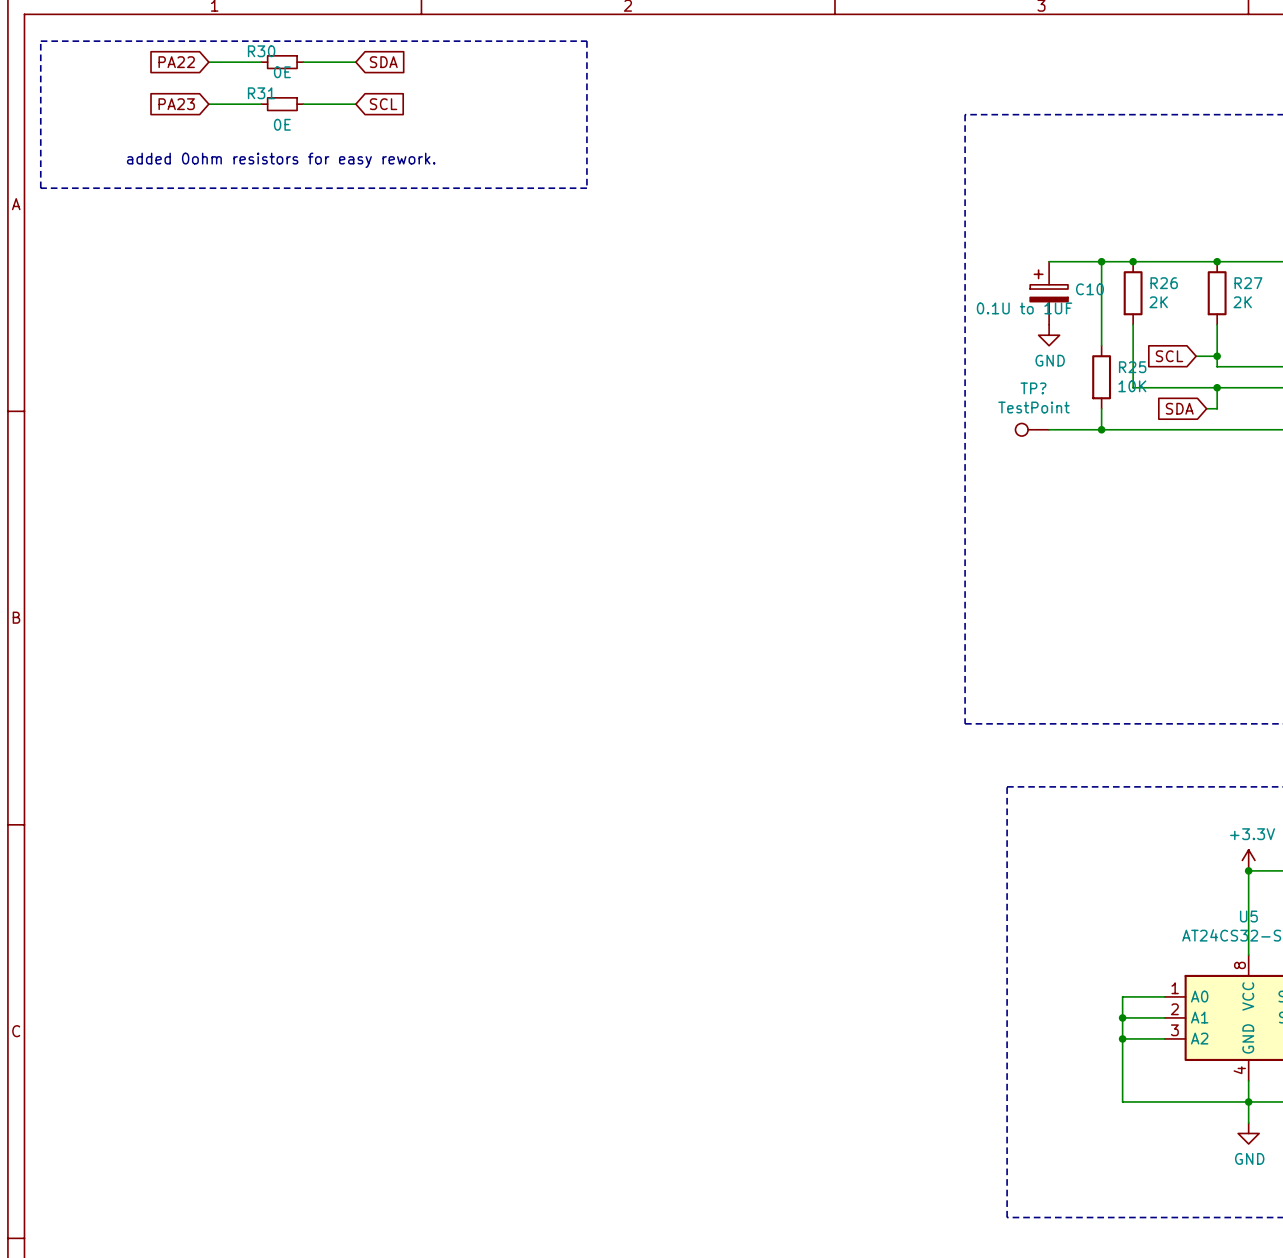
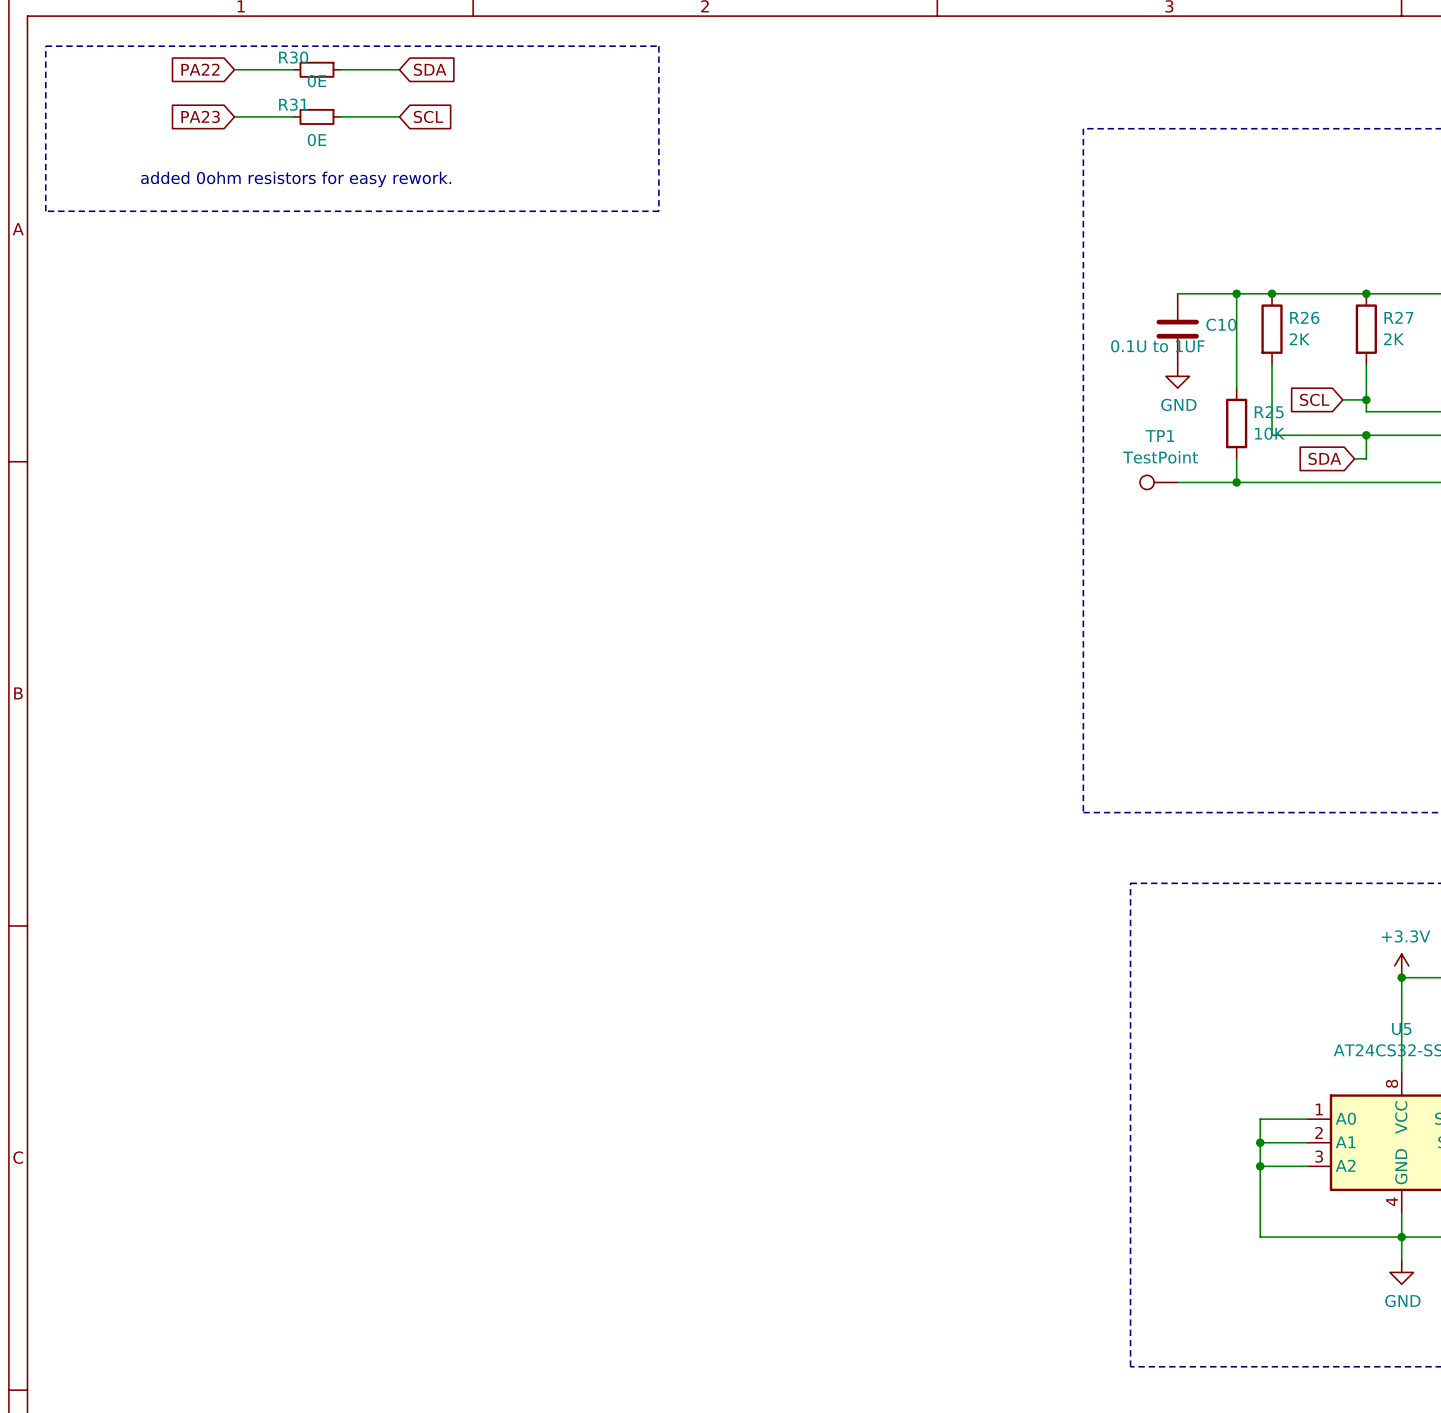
C10 symbol: [1030, 261, 1069, 325] -> [1156, 293, 1199, 365]
TP? name: TP? (1033, 388) -> TP1 (1159, 436)

